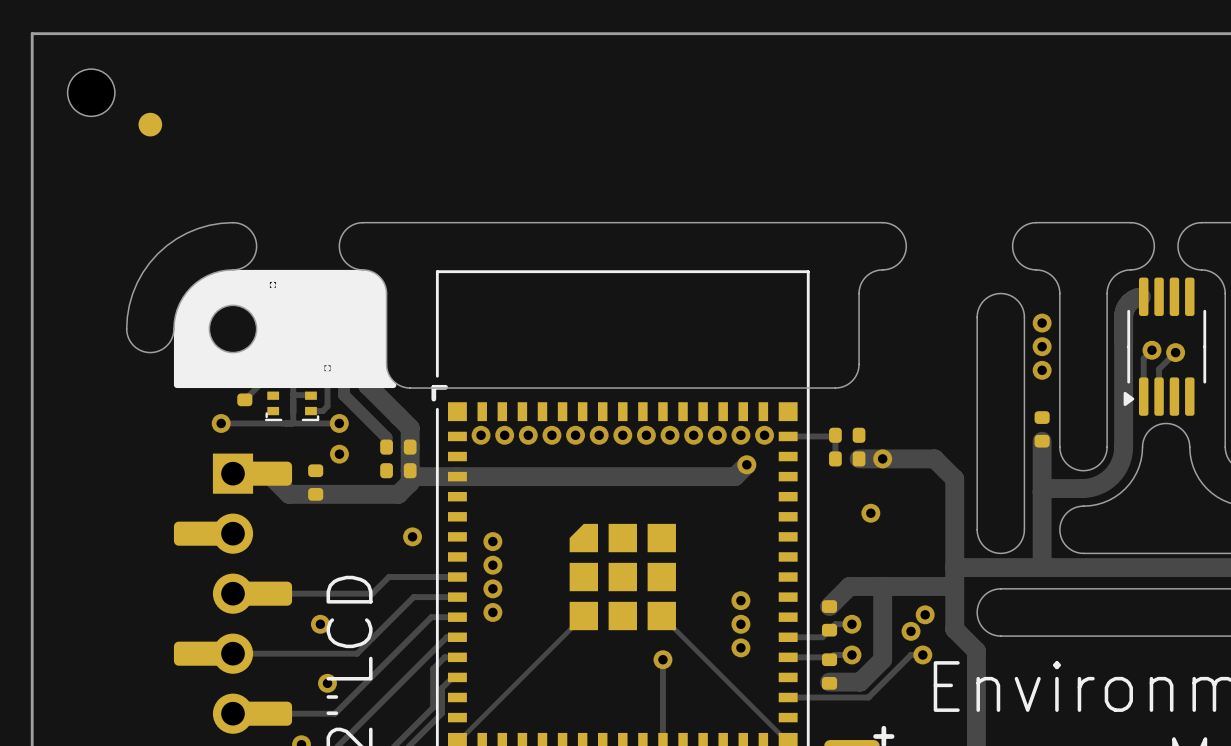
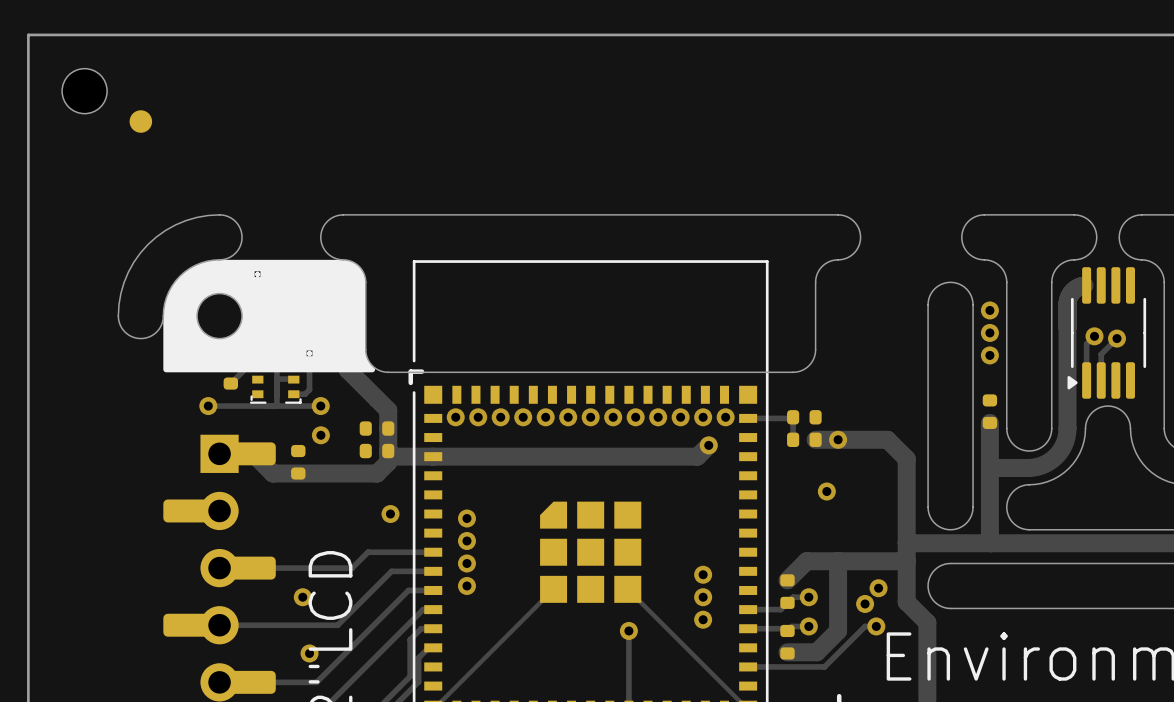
track: (344, 373) (344, 395) (386, 437) (386, 447) -> none

